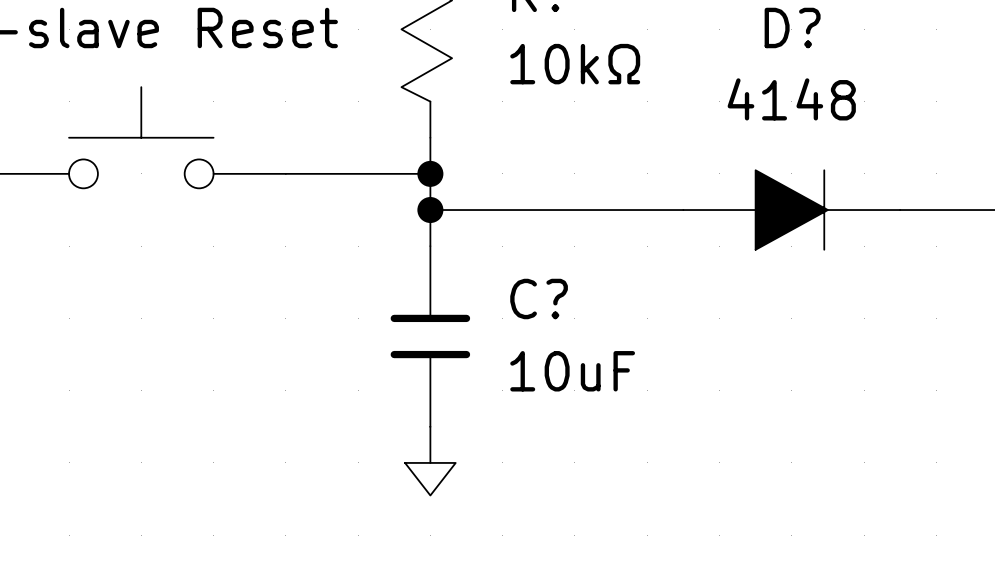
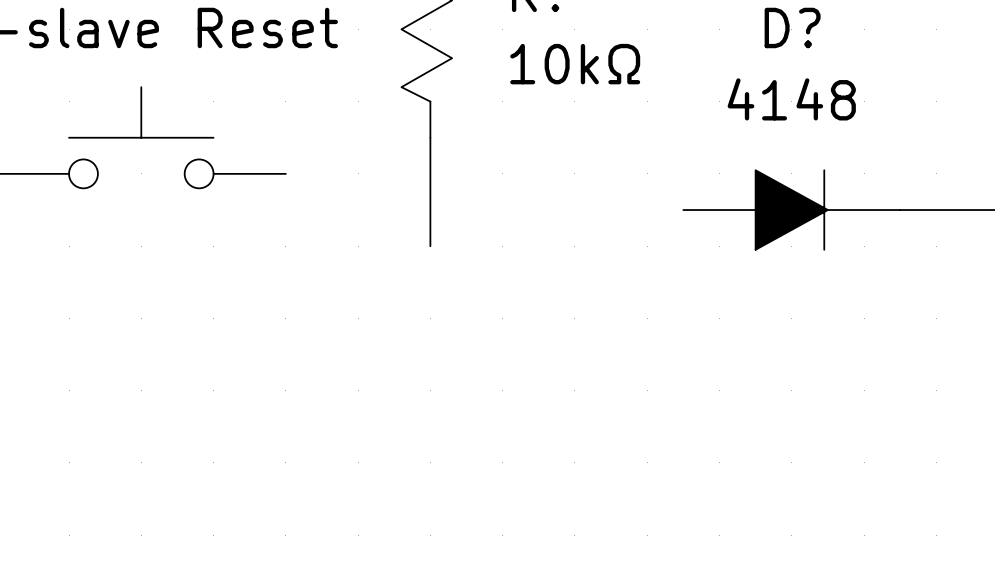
wire: (285, 173) (430, 173) -> none
junction: (430, 173) -> none
wire: (430, 210) (683, 210) -> none
junction: (430, 210) -> none
C?: 10uF (430, 336) -> none
power symbol: (430, 461) -> none

